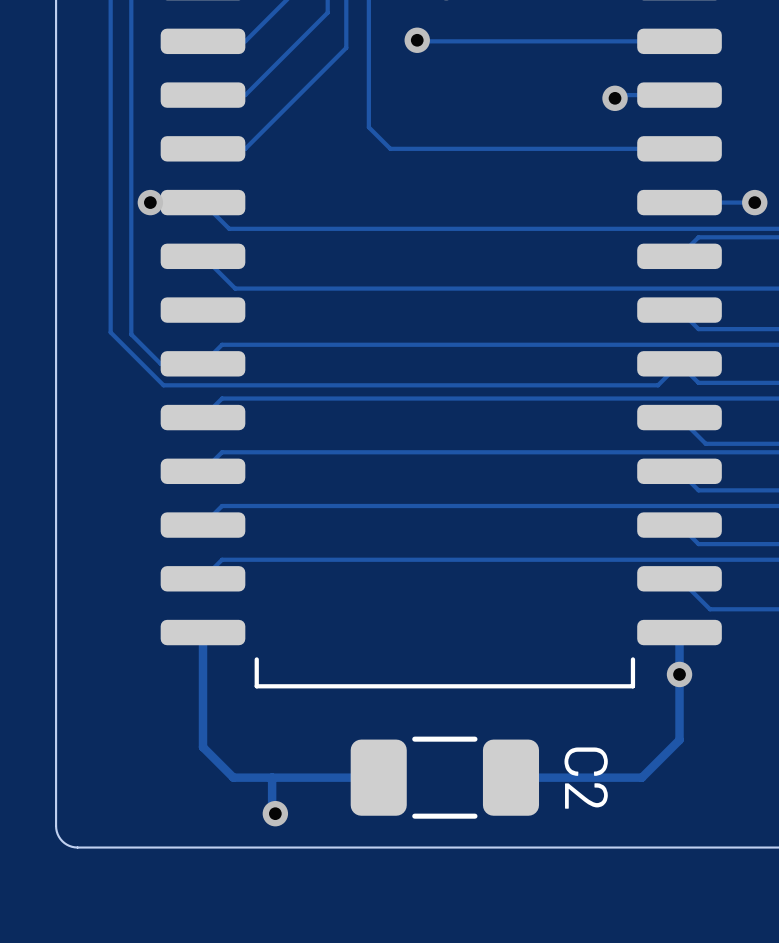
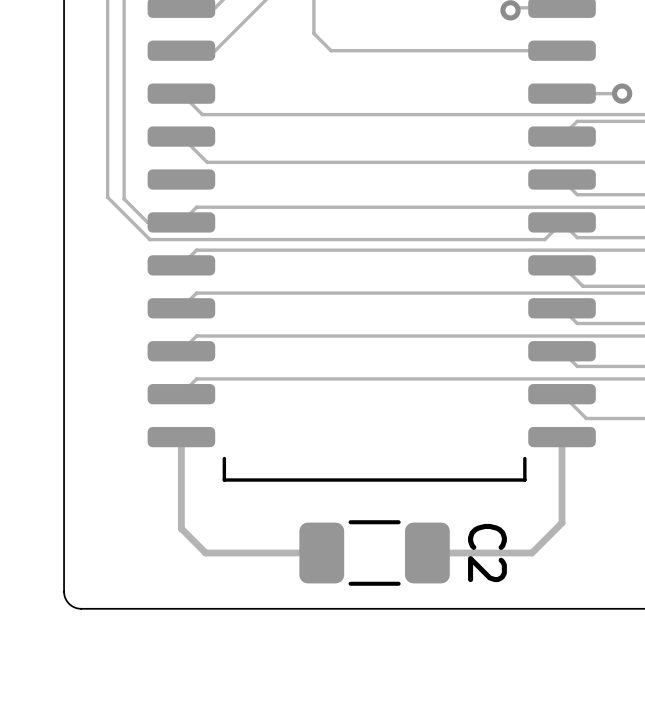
via: (150, 202) -> none
via: (679, 674) -> none
track: (272, 777) (272, 810) (275, 813) -> none
via: (275, 813) -> none

